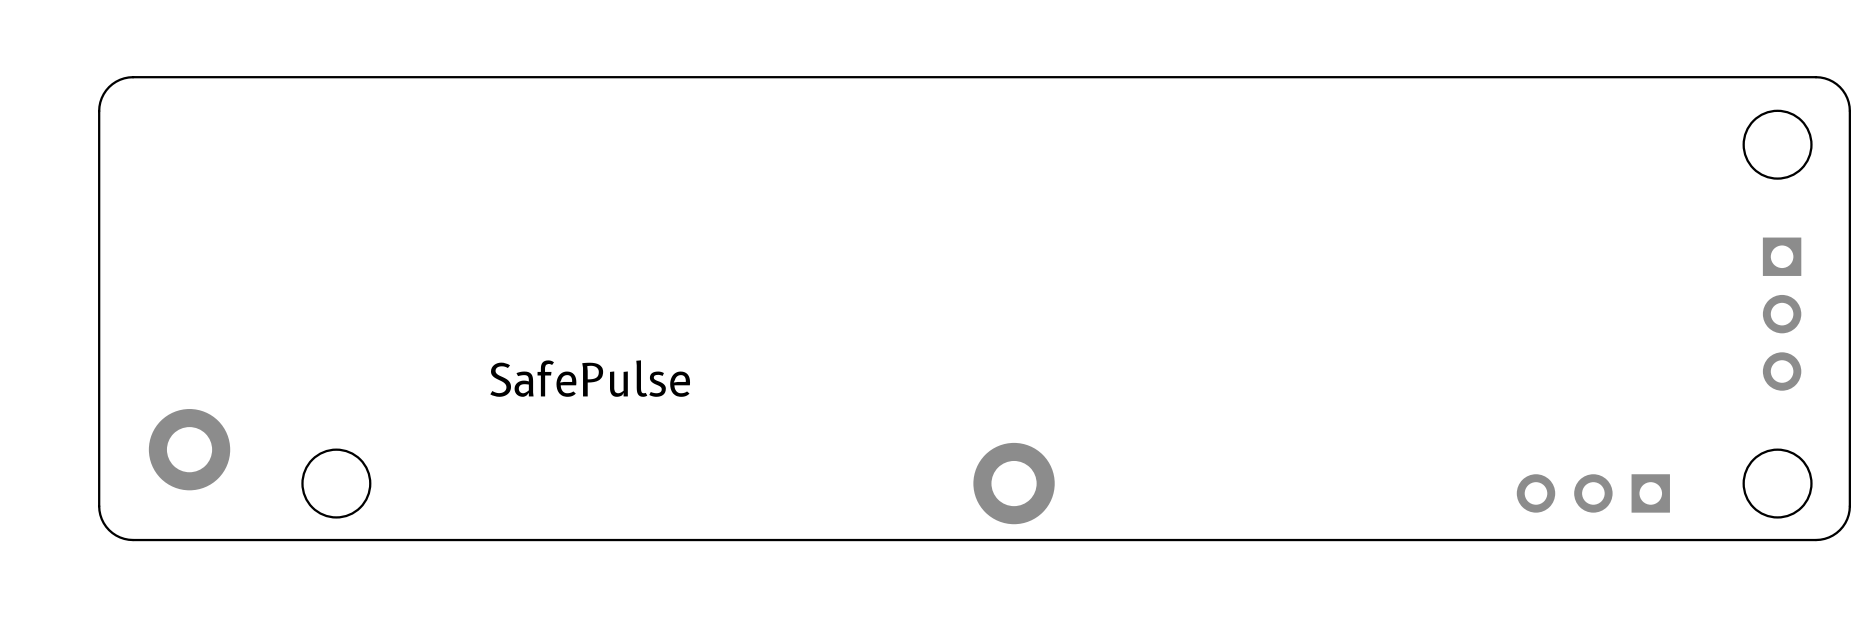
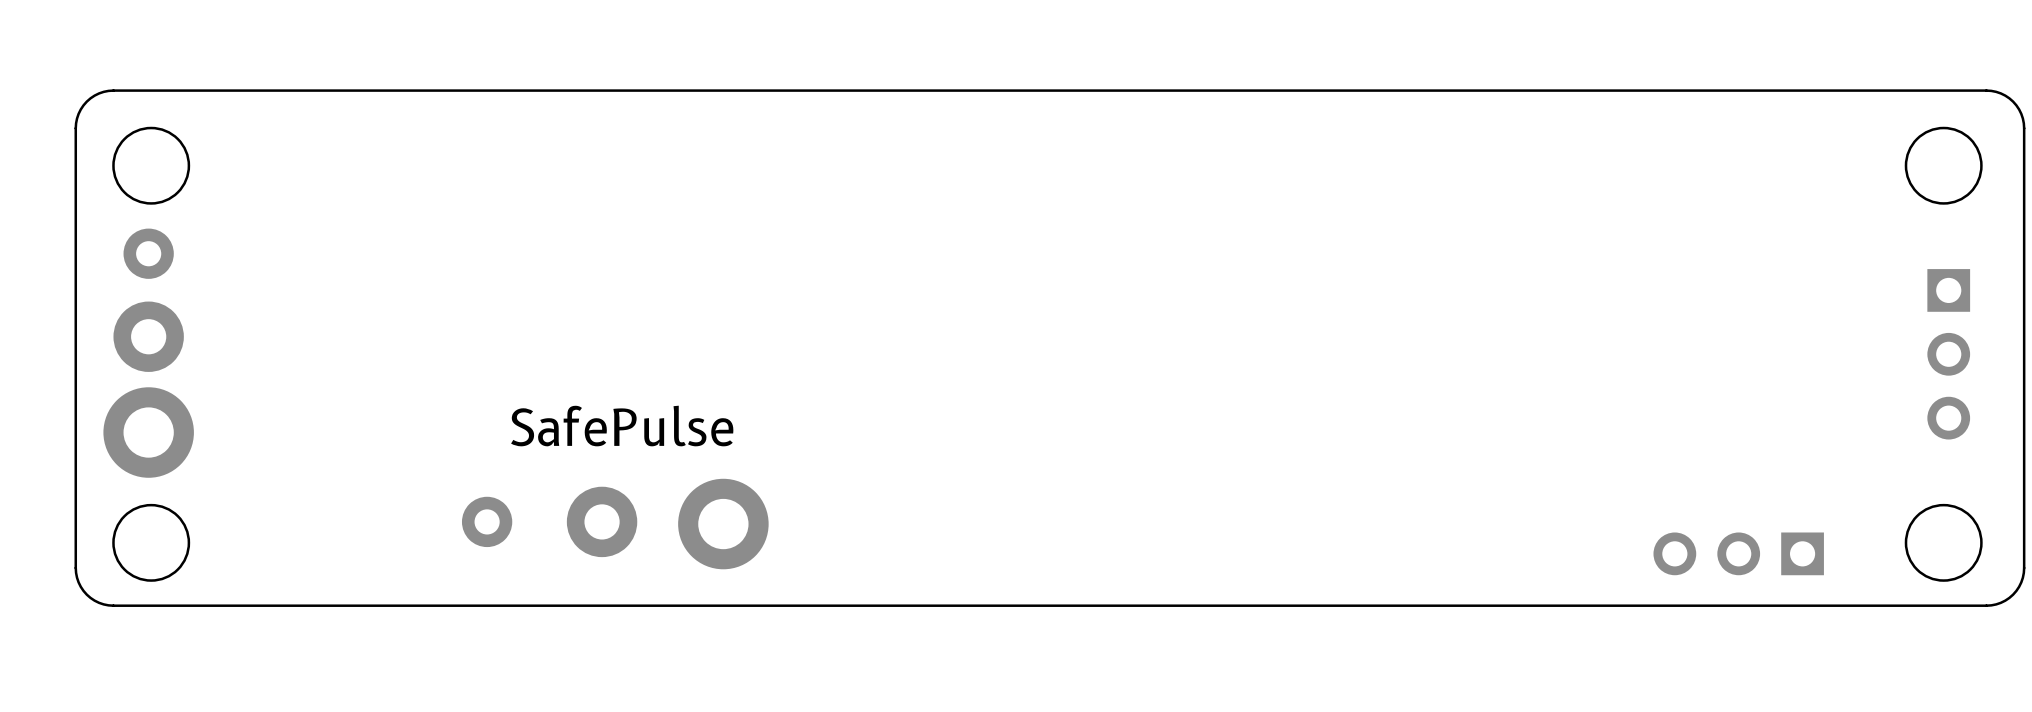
round board edge: none -> [112, 126, 191, 205]
part: none -> (148, 253)
part: none -> (148, 336)
part position: (189, 449) -> (148, 432)
part: none -> (487, 521)
part: none -> (602, 521)
part: none -> (723, 524)
round board edge position: (336, 483) -> (151, 542)
part: (1014, 483) -> none

